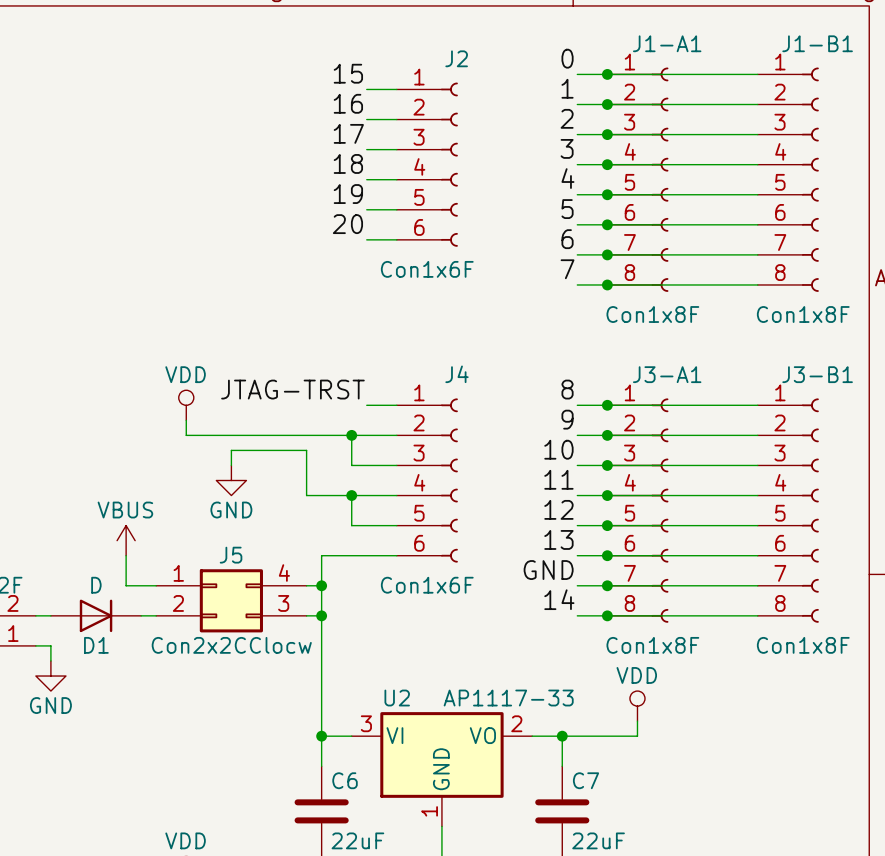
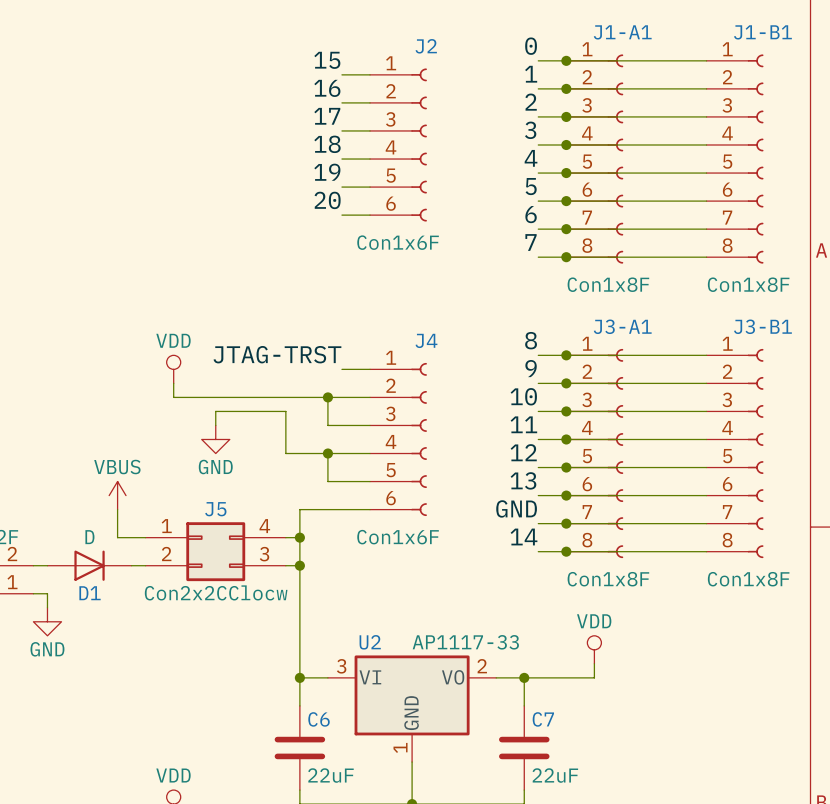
label position: 8 (567, 389) -> 8 (531, 340)
junction: none -> (566, 355)
wire: (577, 405) (757, 405) -> (538, 355) (706, 355)
junction: (607, 405) -> none
label position: 9 (567, 419) -> 9 (531, 368)
junction: none -> (566, 383)
wire: (577, 435) (757, 435) -> (538, 383) (706, 383)
junction: (607, 435) -> none
label position: 10 (558, 449) -> 10 (523, 396)
junction: none -> (566, 411)
wire: (577, 465) (757, 465) -> (538, 411) (706, 411)
junction: (607, 465) -> none
label position: 11 (558, 479) -> 11 (523, 424)
junction: none -> (566, 439)
wire: (577, 495) (757, 495) -> (538, 439) (706, 439)
junction: (607, 495) -> none
label position: 12 (558, 509) -> 12 (523, 452)
junction: none -> (566, 467)
J3-A1 position: (637, 510) -> (594, 453)
J3-B1 position: (788, 510) -> (735, 453)
wire: (577, 525) (757, 525) -> (538, 467) (706, 467)
junction: (607, 525) -> none
label position: 13 (558, 539) -> 13 (523, 480)
junction: none -> (566, 495)
wire: (577, 555) (757, 555) -> (538, 495) (706, 495)
junction: (607, 555) -> none
label position: GND (548, 570) -> GND (516, 508)
junction: none -> (566, 523)
wire: (577, 585) (757, 585) -> (538, 523) (706, 523)
junction: (607, 585) -> none
label position: 14 (559, 599) -> 14 (524, 536)
junction: none -> (566, 551)
wire: (577, 615) (757, 615) -> (538, 551) (706, 551)
junction: (607, 615) -> none

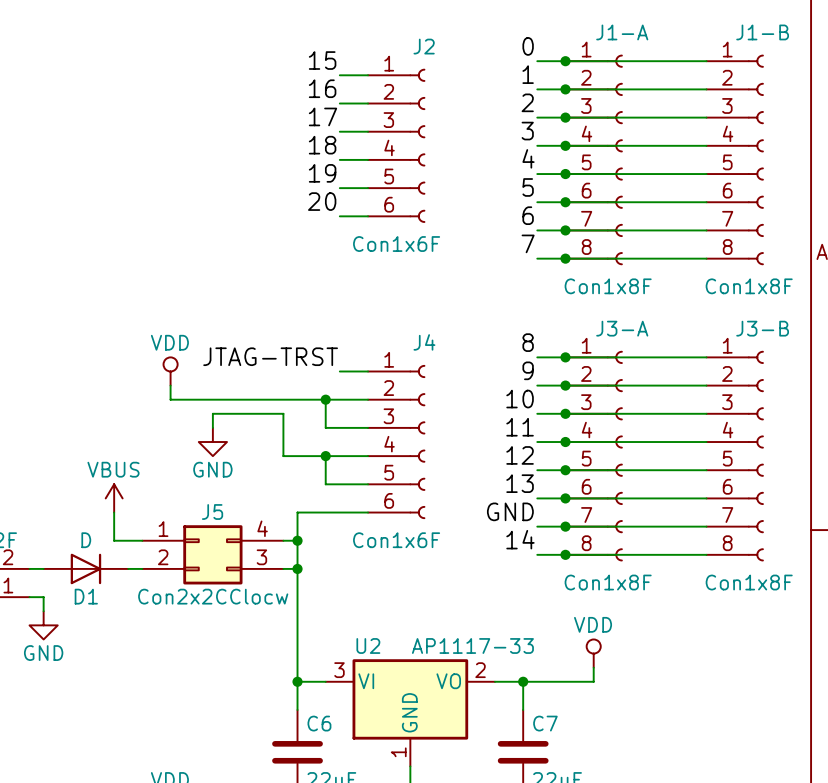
J1-A1 name: J1-A1 (622, 32) -> J1-A (622, 32)
J1-B1 name: J1-B1 (762, 32) -> J1-B (762, 32)
J3-A1 name: J3-A1 (622, 326) -> J3-A (622, 328)
J3-B1 name: J3-B1 (762, 326) -> J3-B (762, 328)

